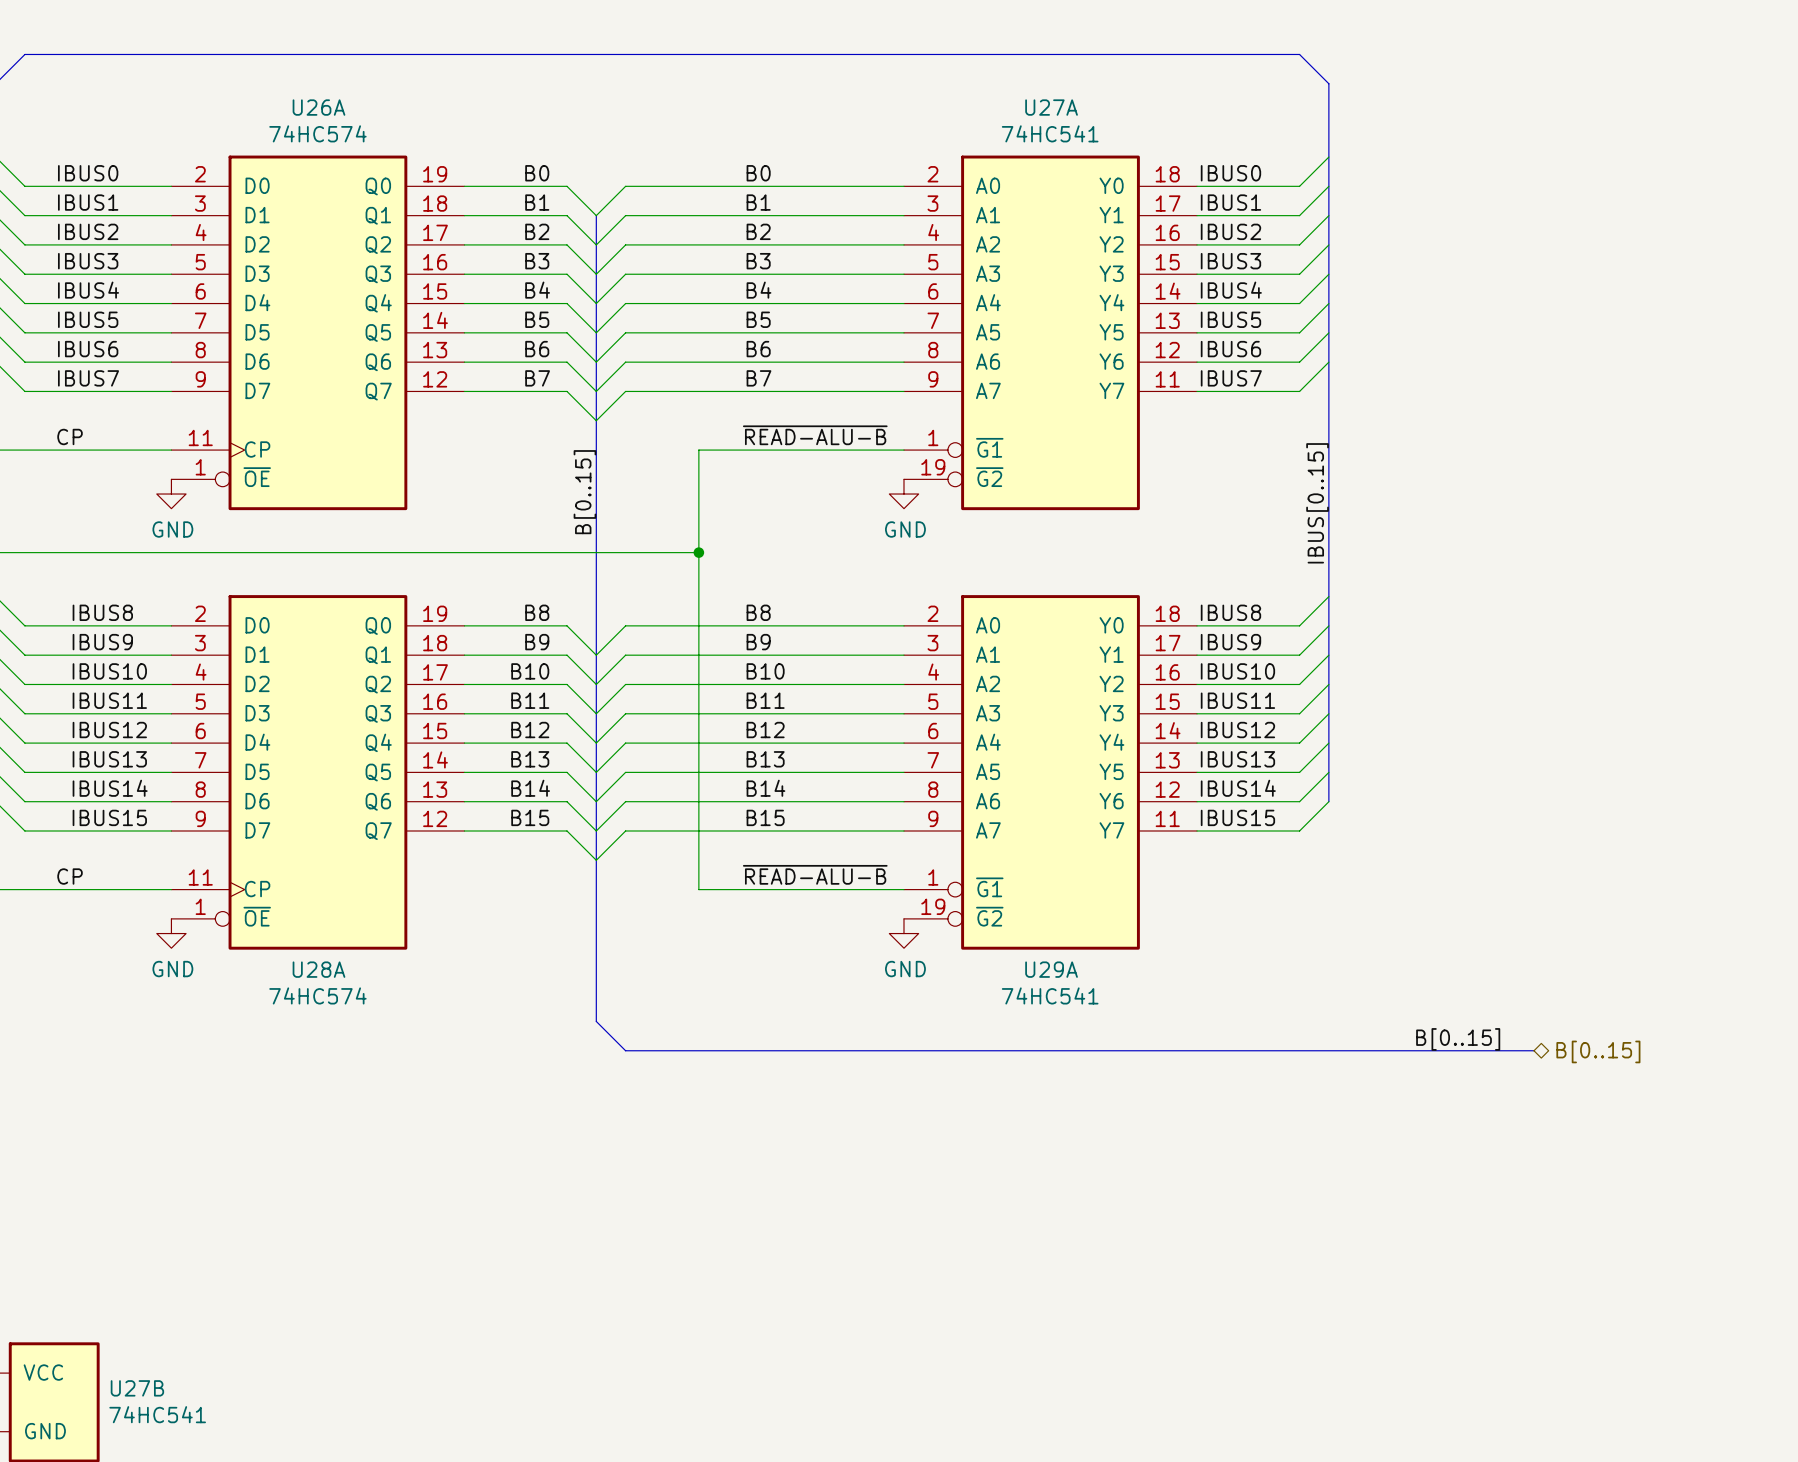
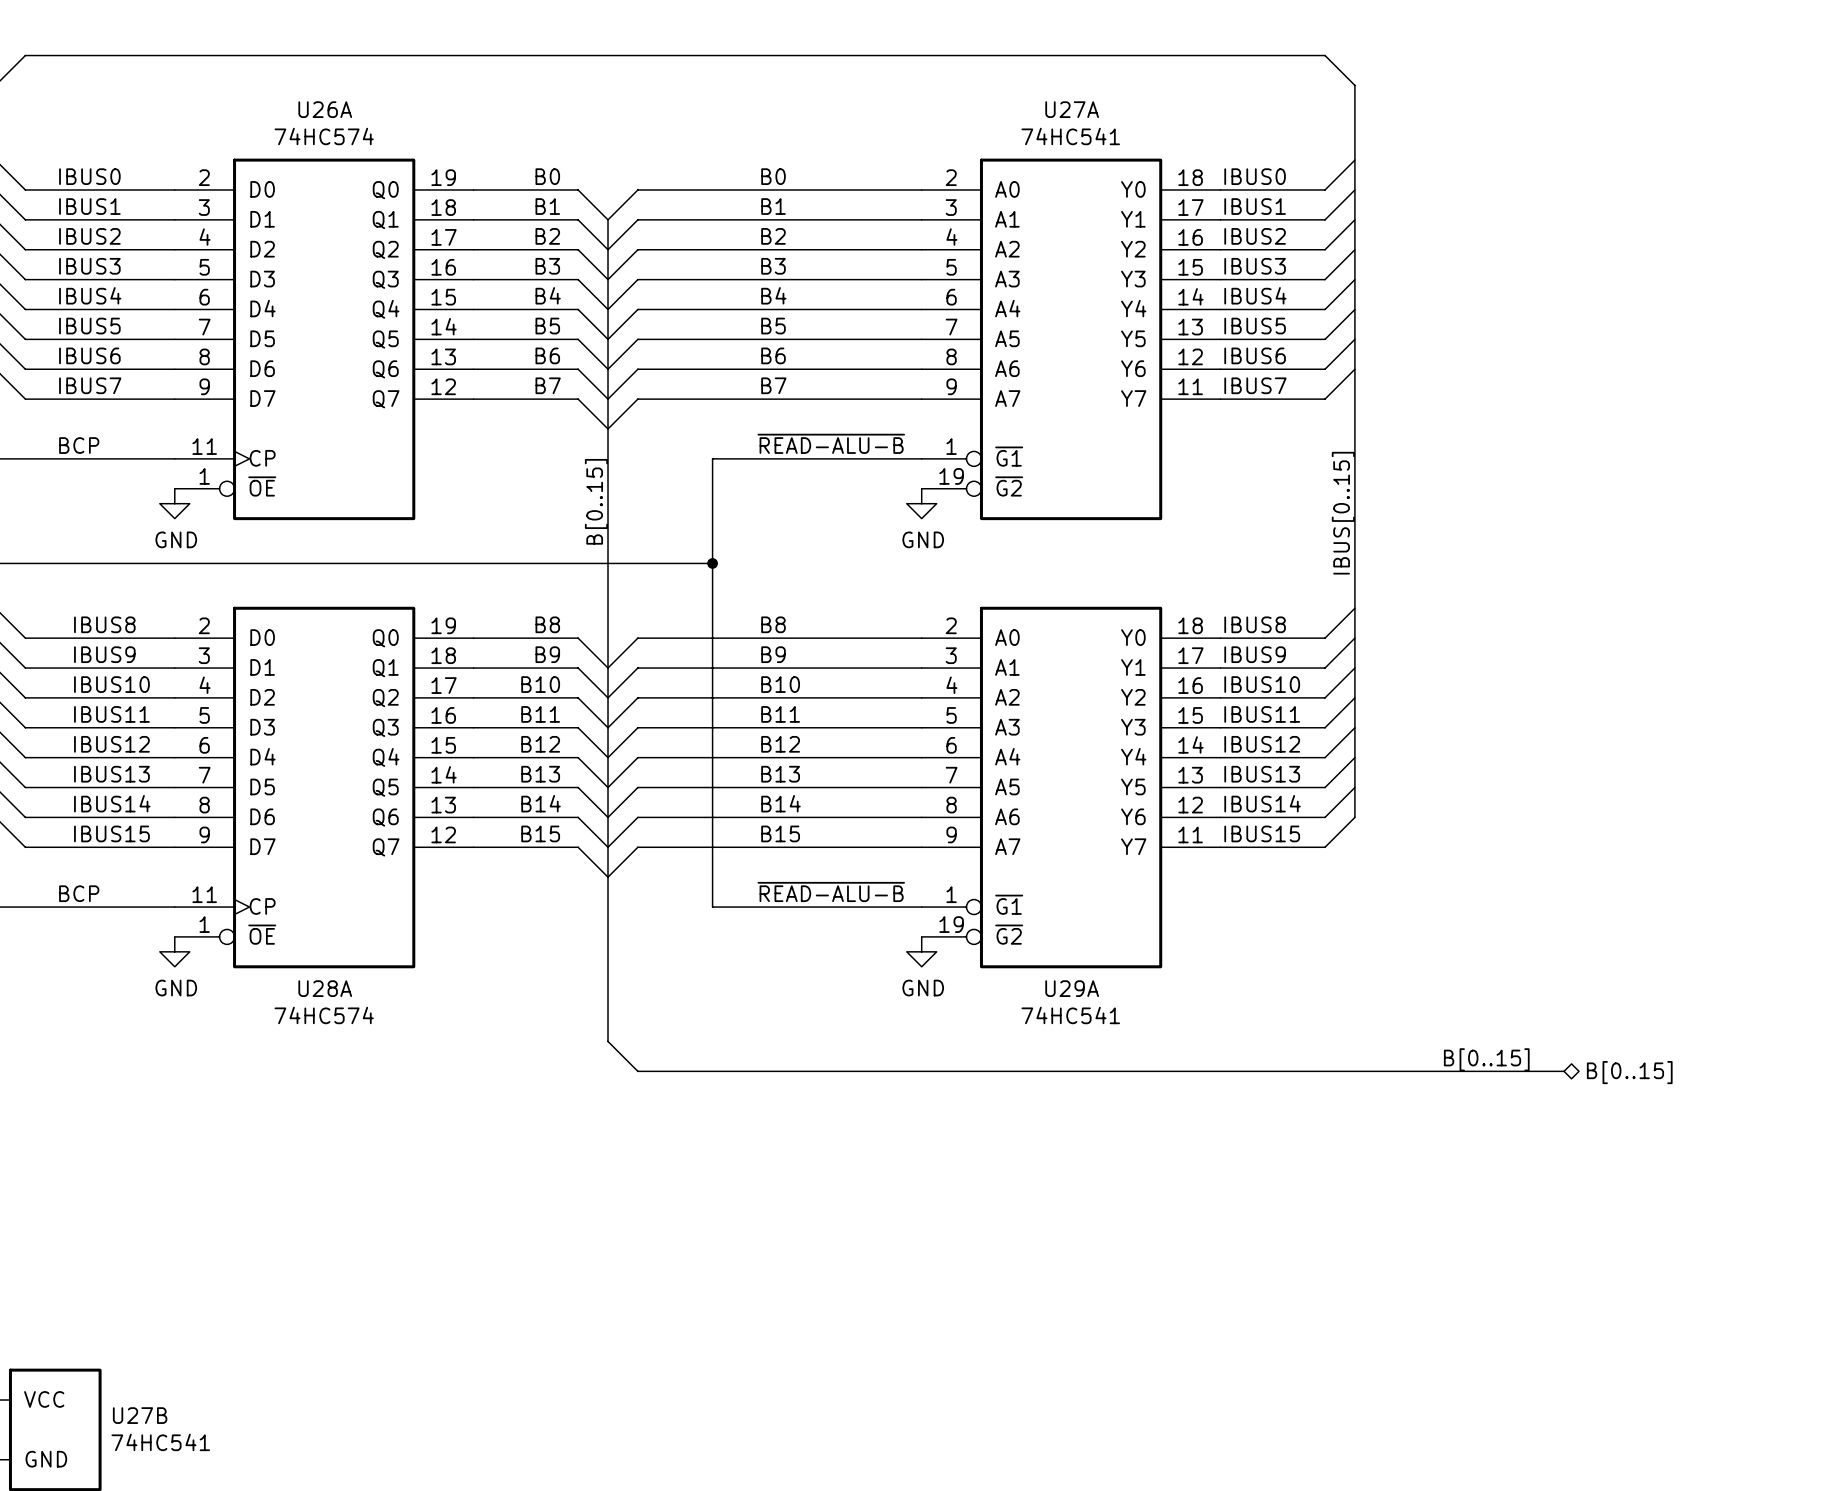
label: CP (70, 436) -> BCP (79, 445)
label: CP (70, 876) -> BCP (79, 893)

